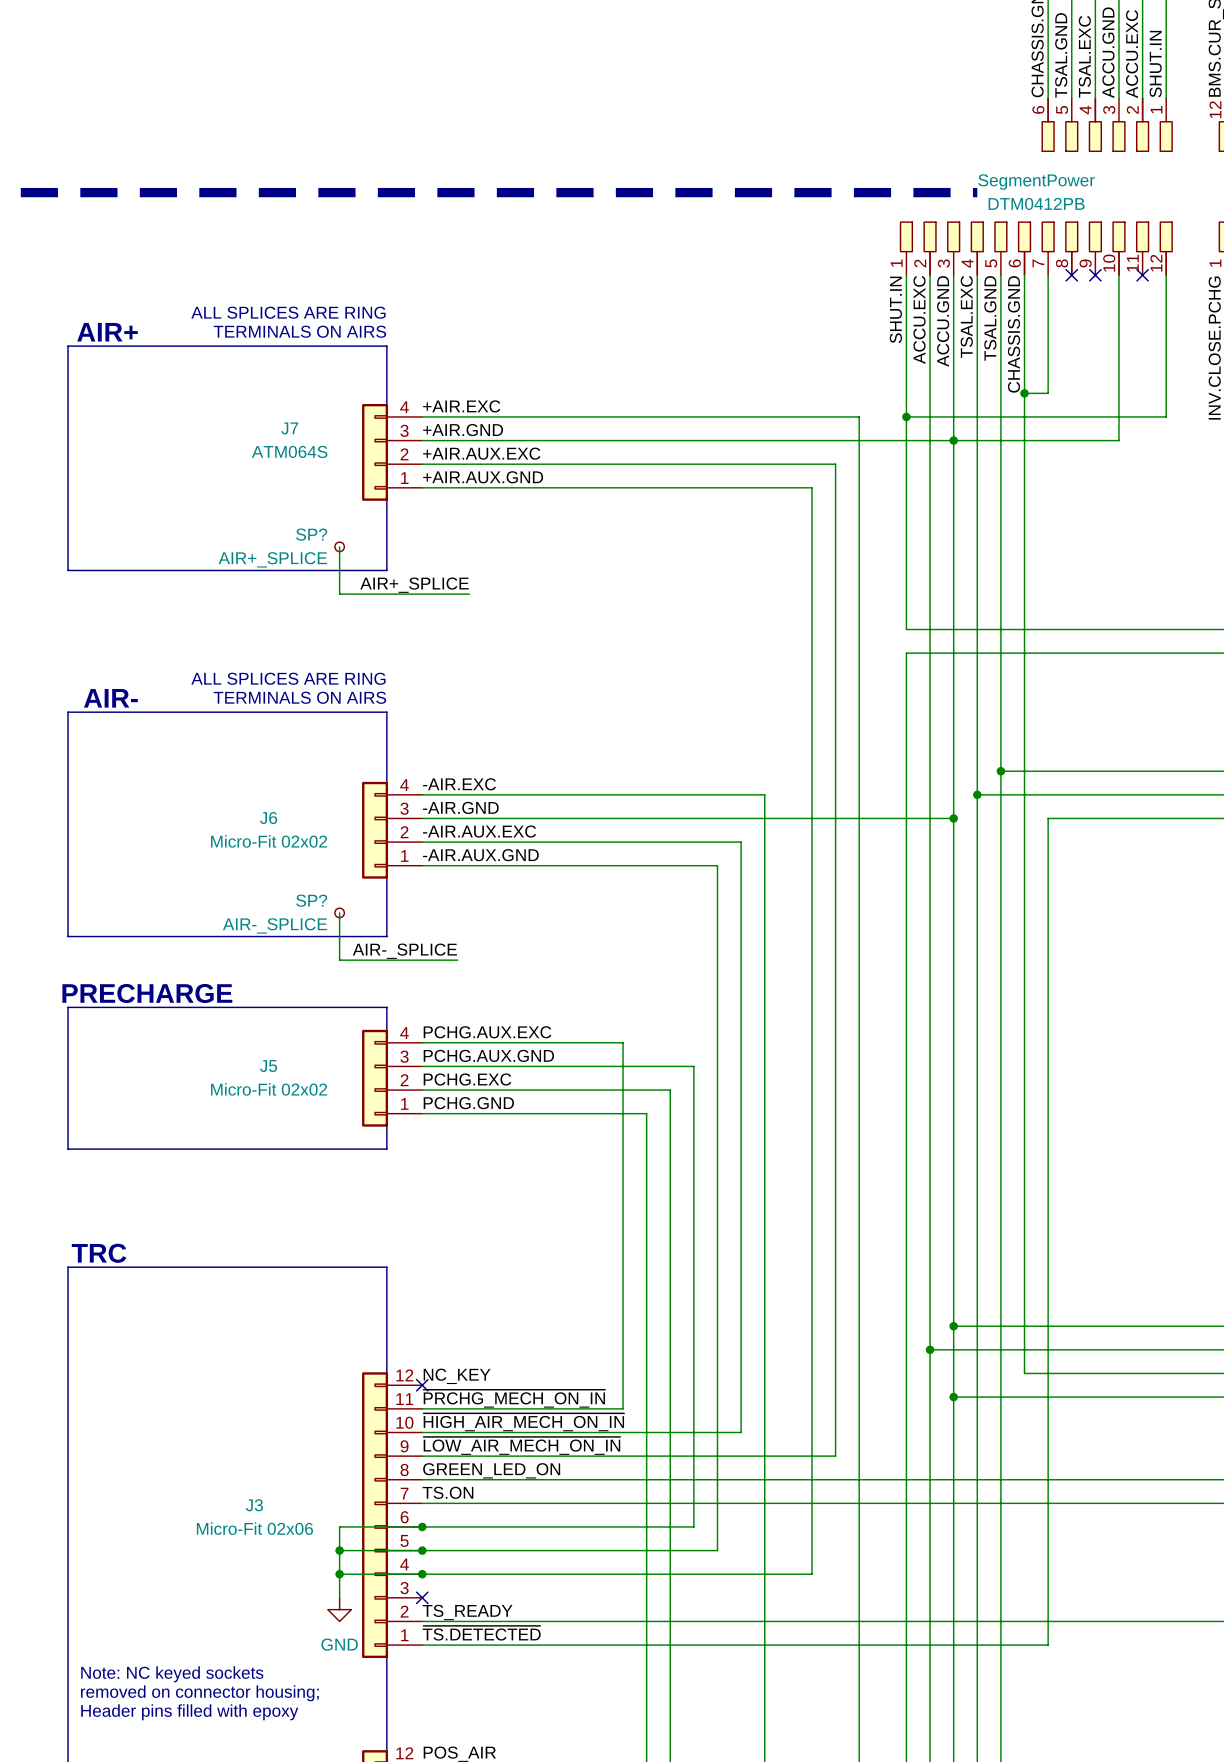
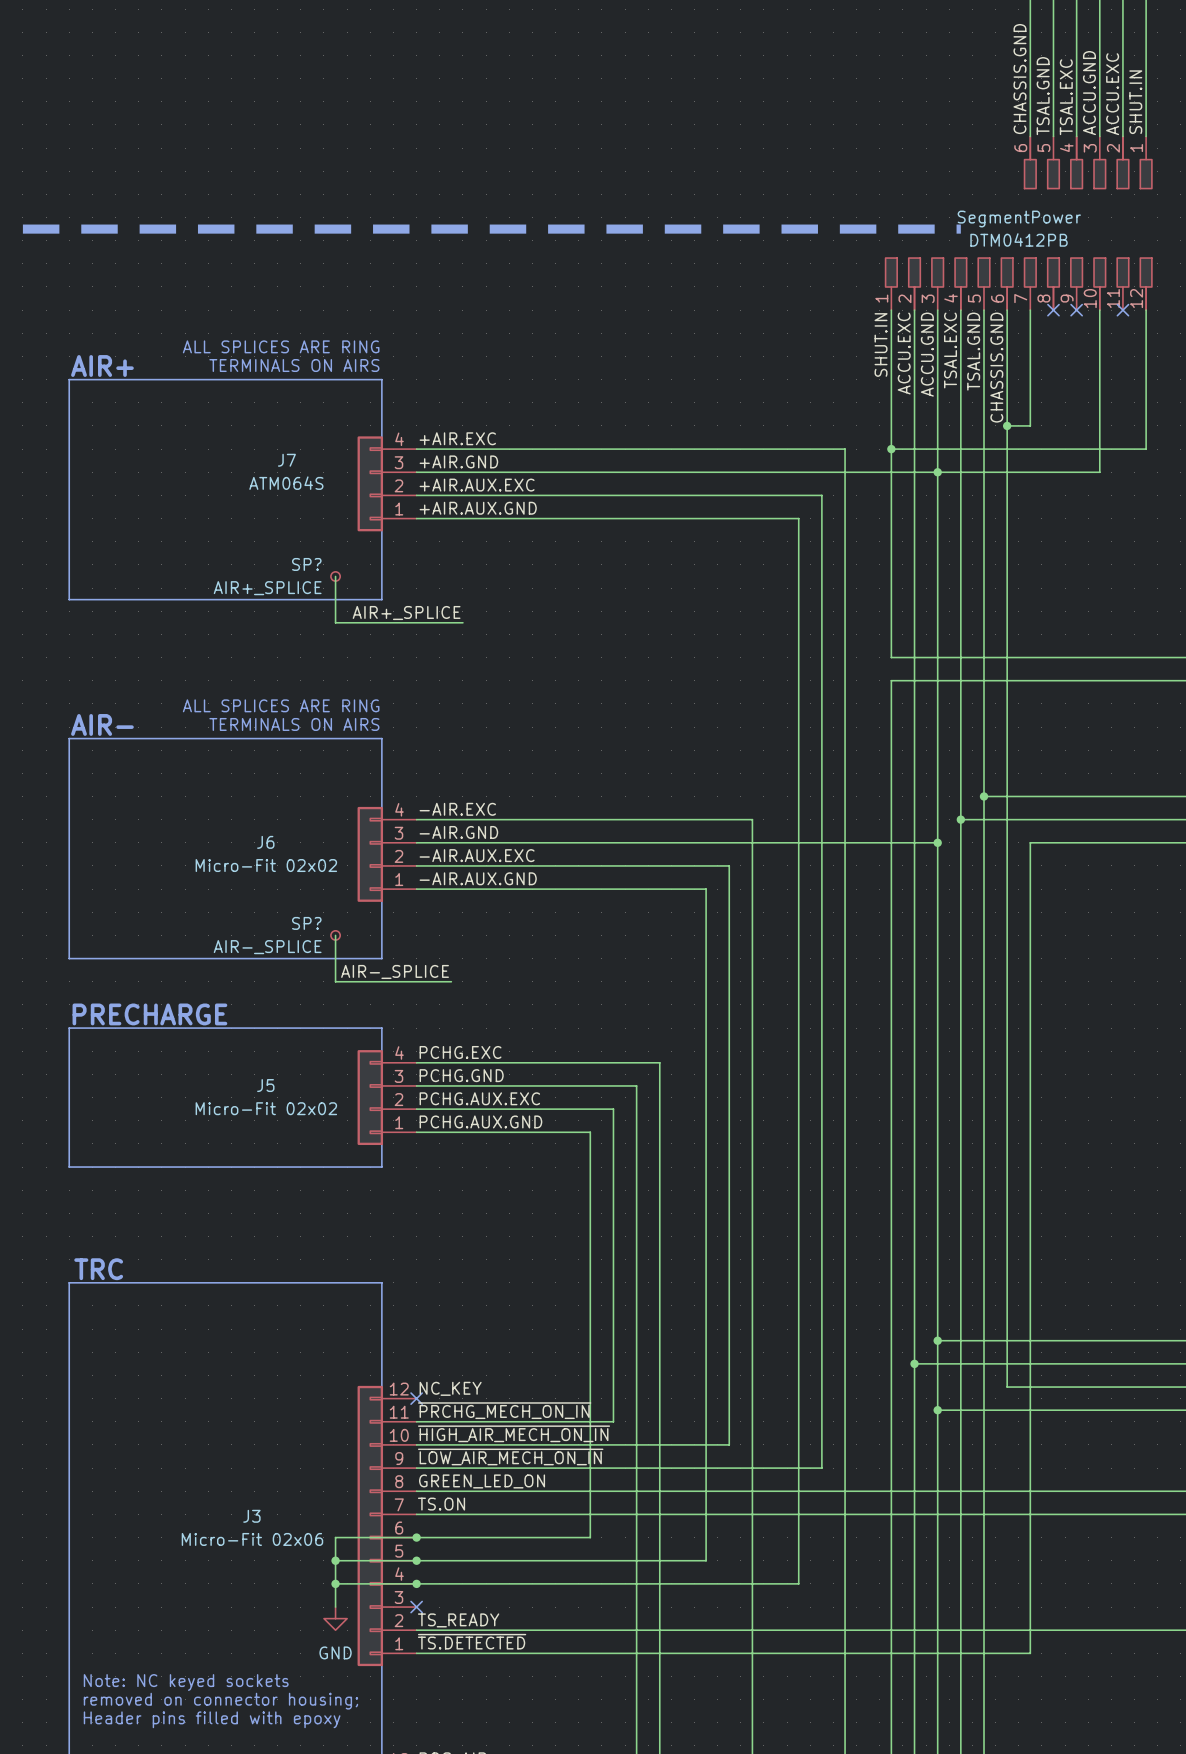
label: PCHG.AUX.EXC (487, 1032) -> PCHG.EXC (460, 1052)
wire: (623, 1042) (623, 1090) (670, 1090) -> (613, 1062) (659, 1062) (659, 1109)
label: PCHG.AUX.GND (488, 1055) -> PCHG.GND (461, 1075)
wire: (646, 1066) (693, 1066) (693, 1526) (599, 1526) -> (590, 1132) (590, 1537)
label: PCHG.EXC (467, 1079) -> PCHG.AUX.EXC (479, 1098)
label: PCHG.GND (468, 1103) -> PCHG.AUX.GND (480, 1121)
wire: (599, 1113) (646, 1113) -> (636, 1085) (636, 1132)

